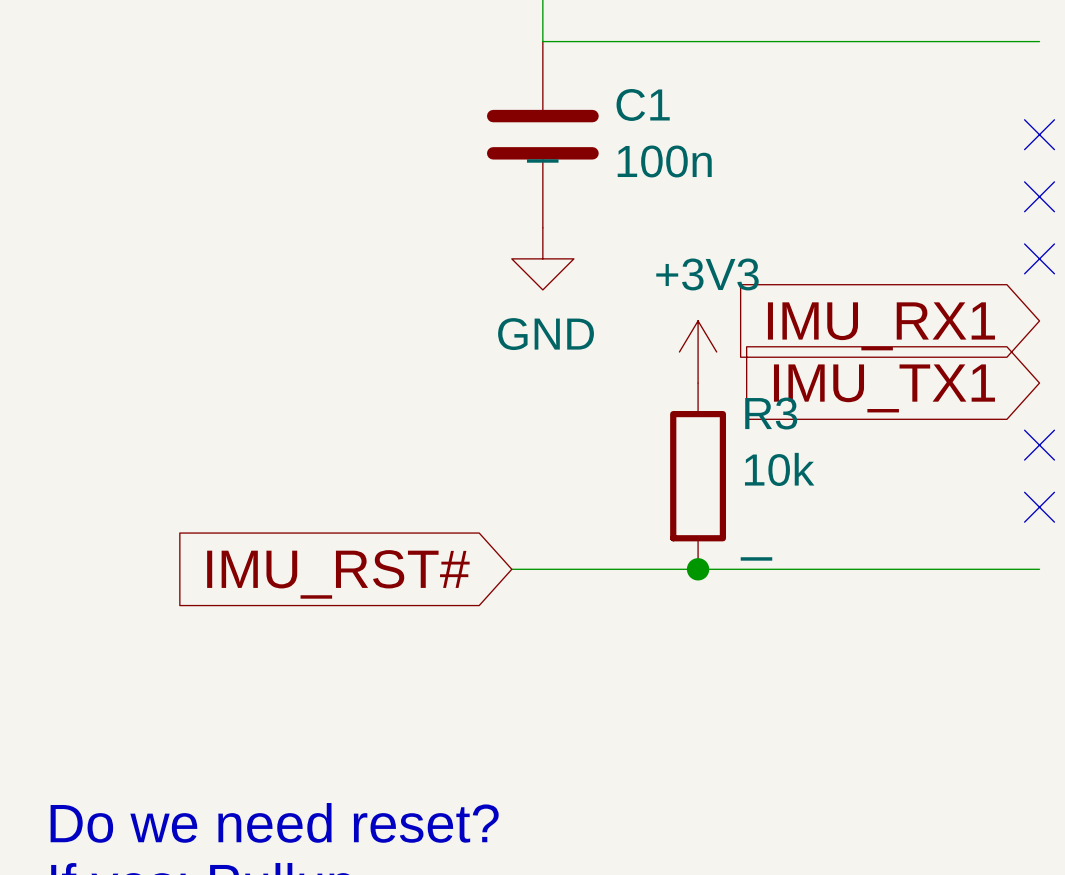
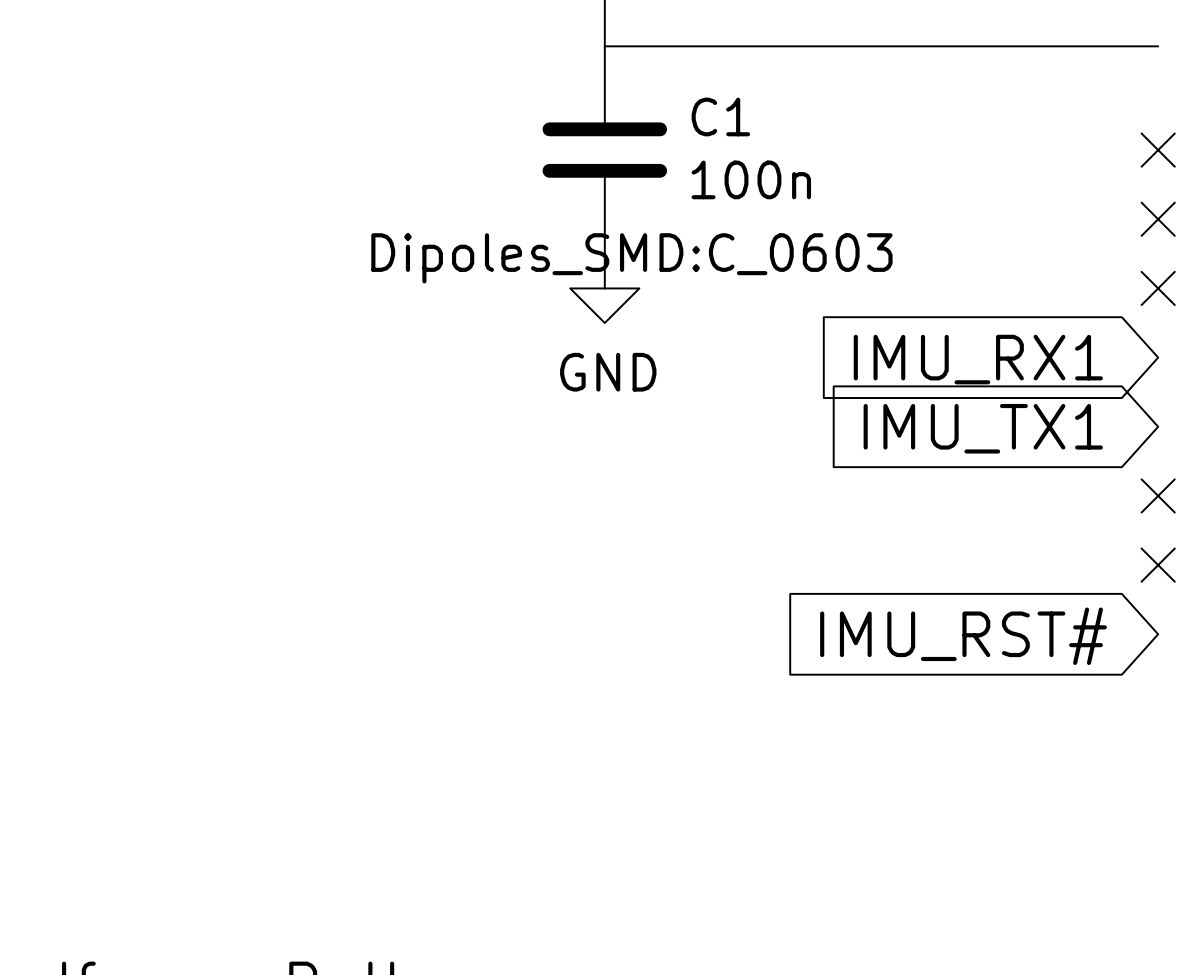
C1 text: none -> Dipoles_SMD:C_0603 (631, 258)
power symbol: +3V3 (698, 352) -> none
R3: 10k (698, 476) -> none
wire: (511, 569) (1039, 569) -> none
junction: (698, 569) -> none
global label position: IMU_RST# (338, 574) -> IMU_RST# (963, 636)
text: Do we need reset? (274, 822) -> none

